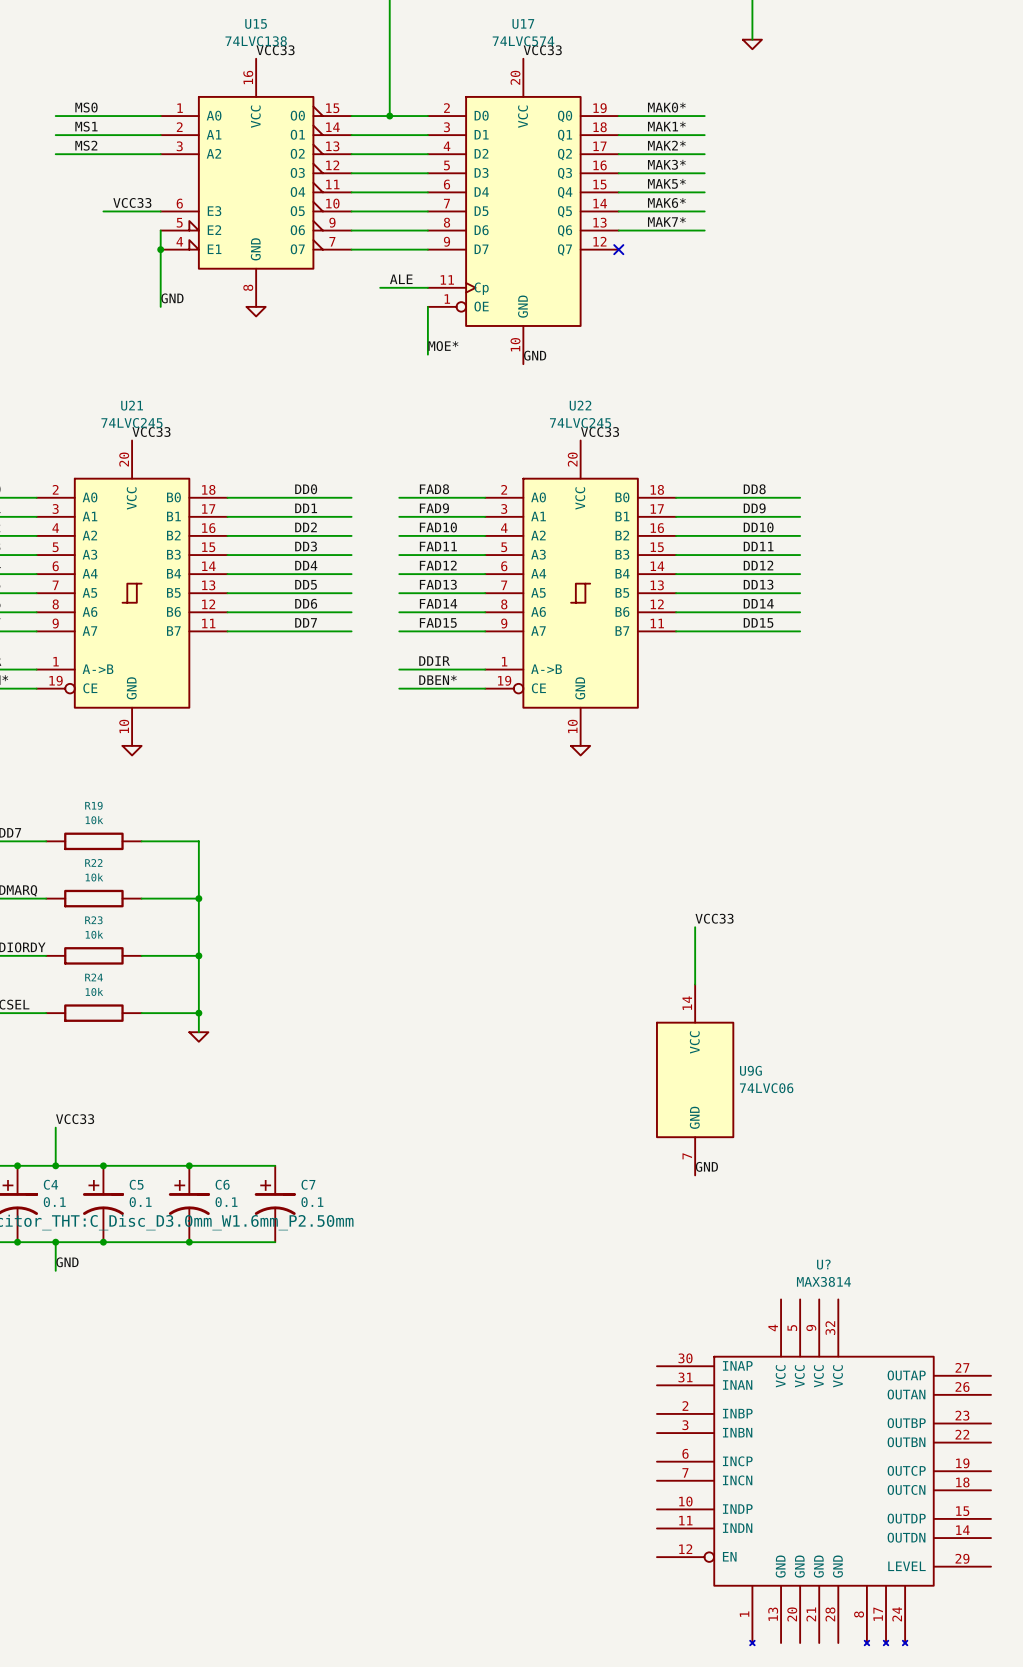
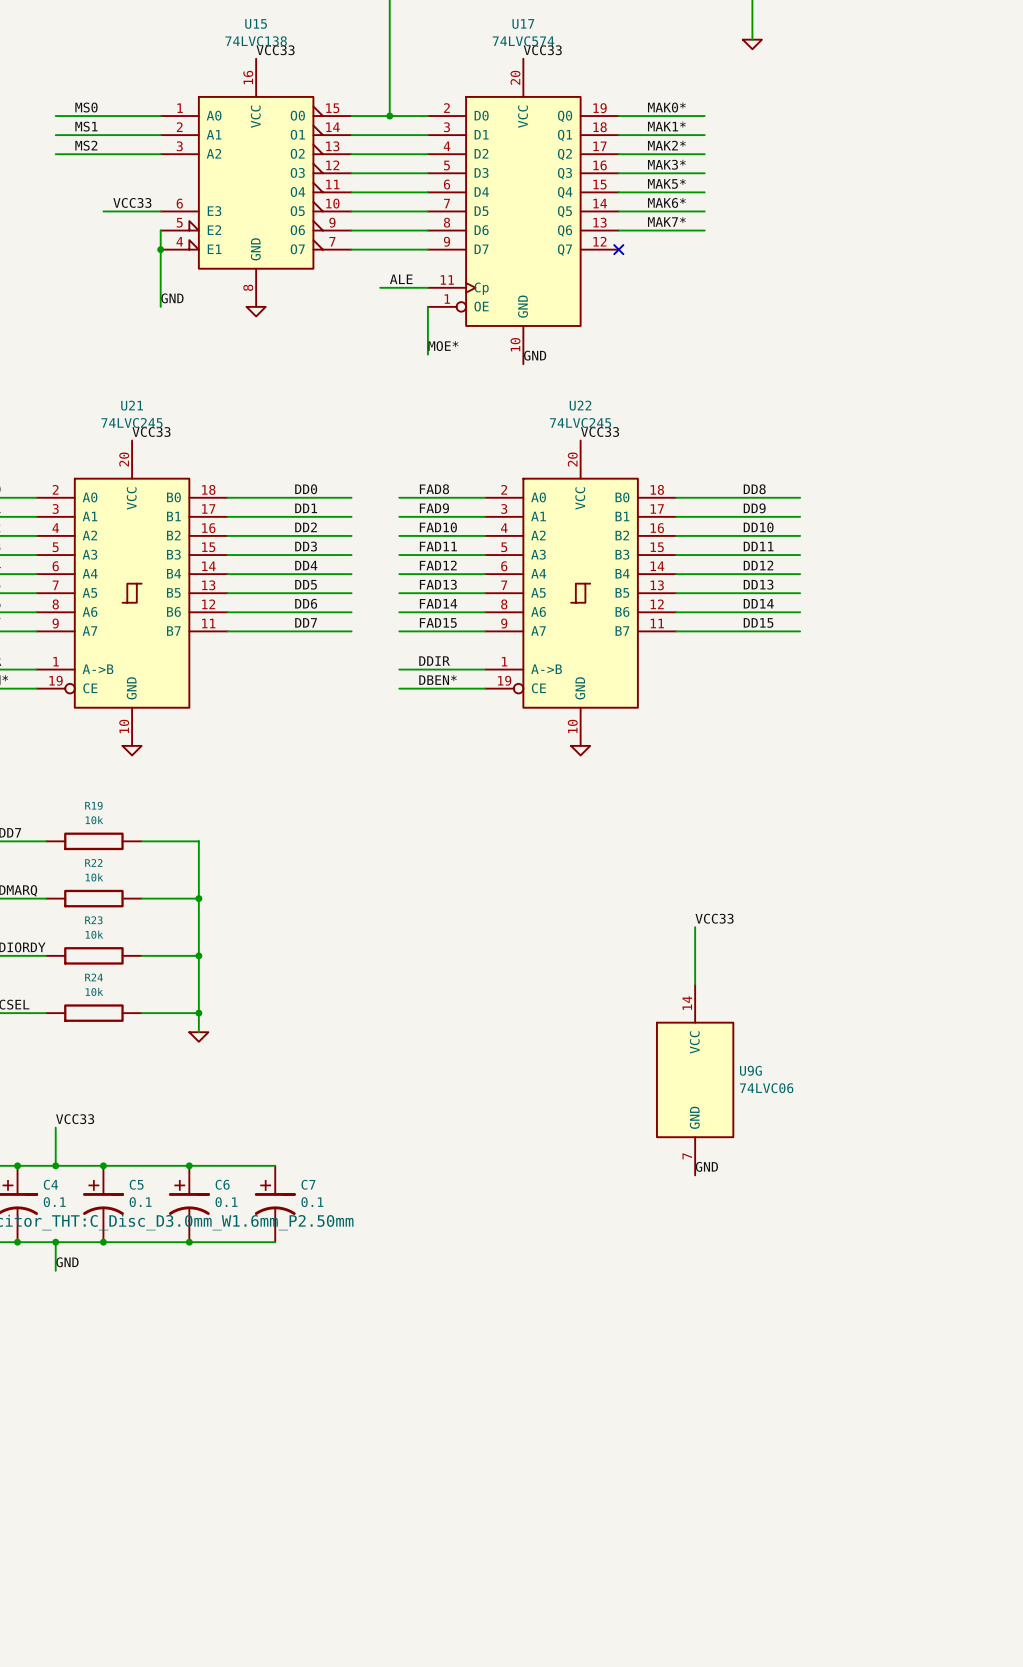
U?: MAX3814 (823, 1472) -> none

